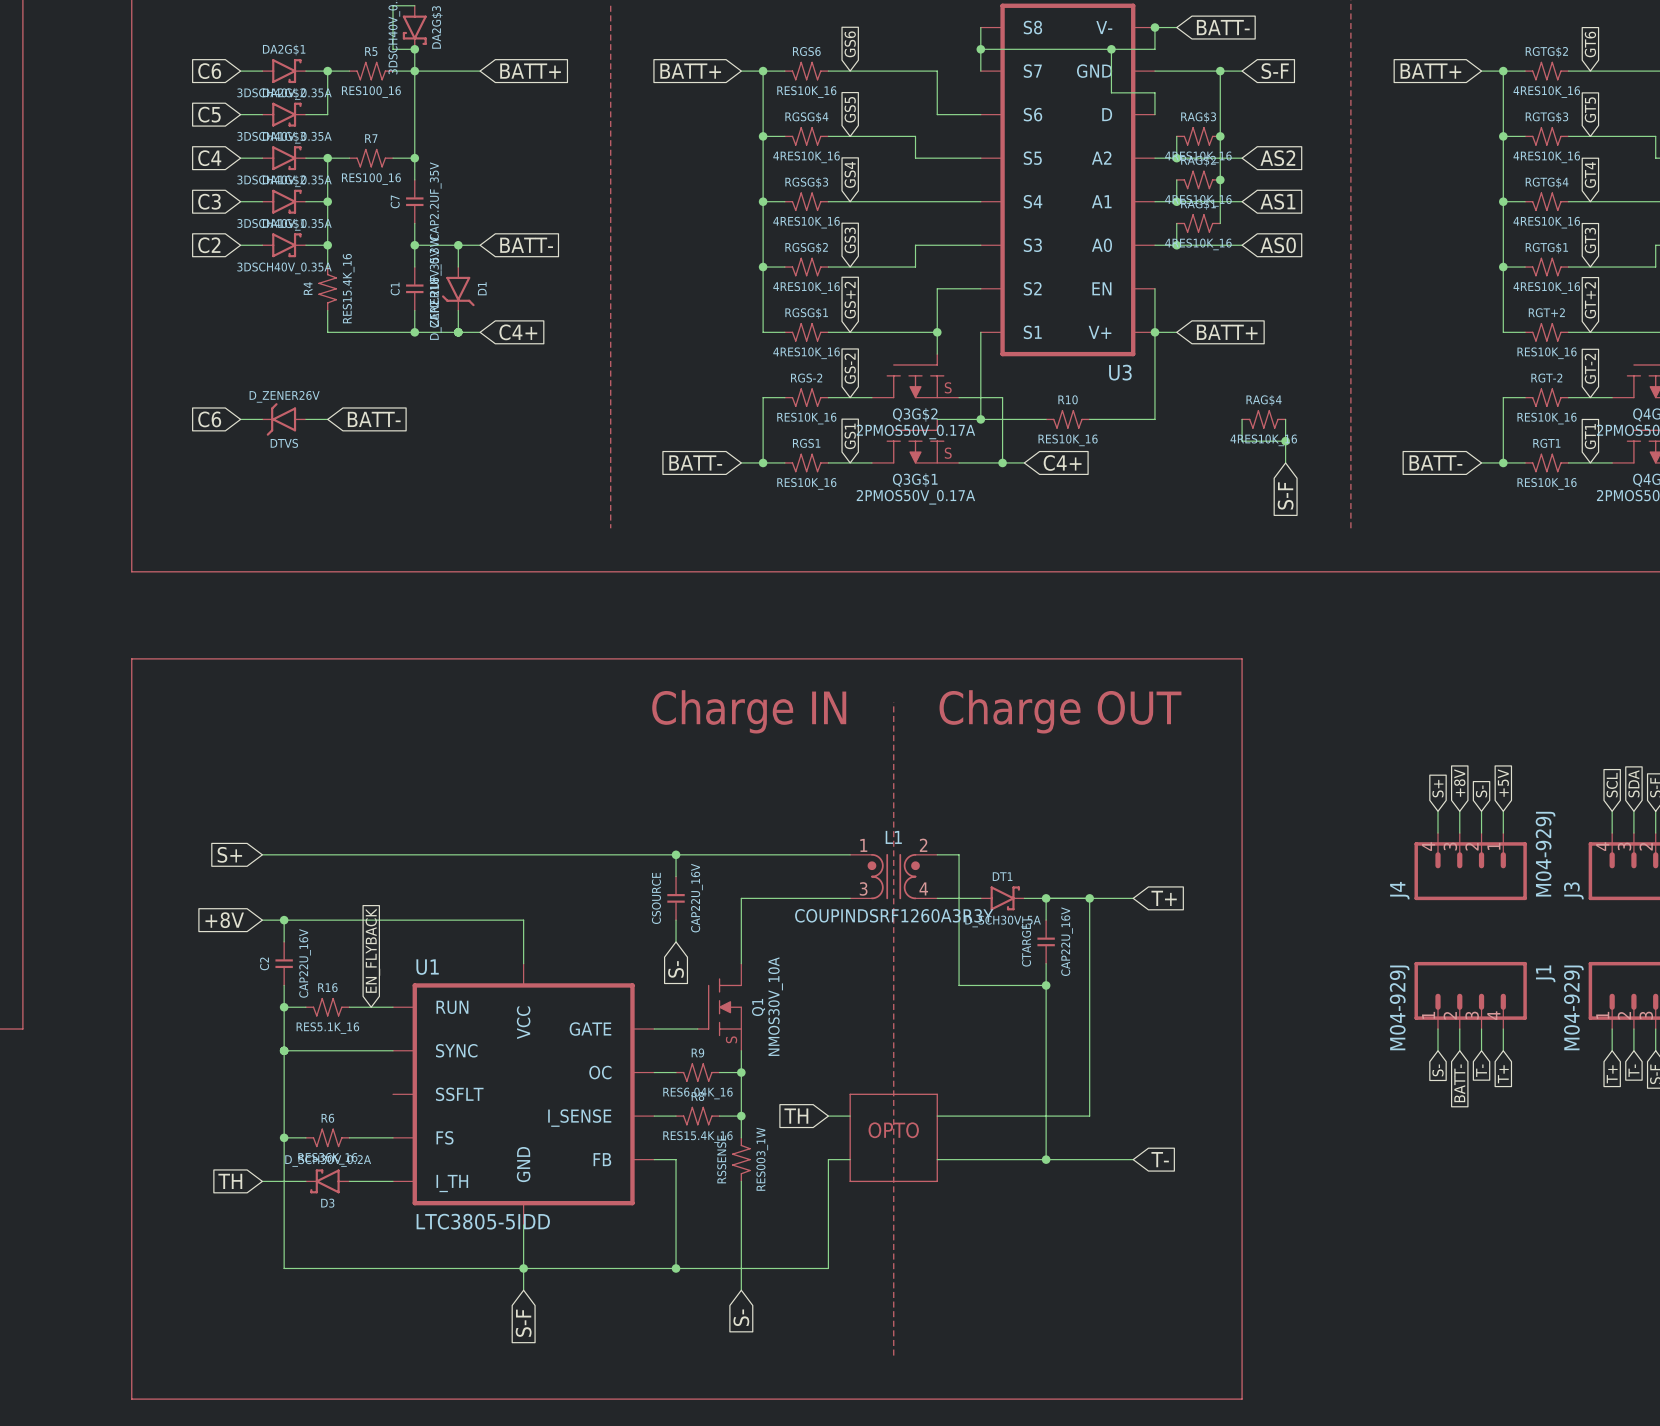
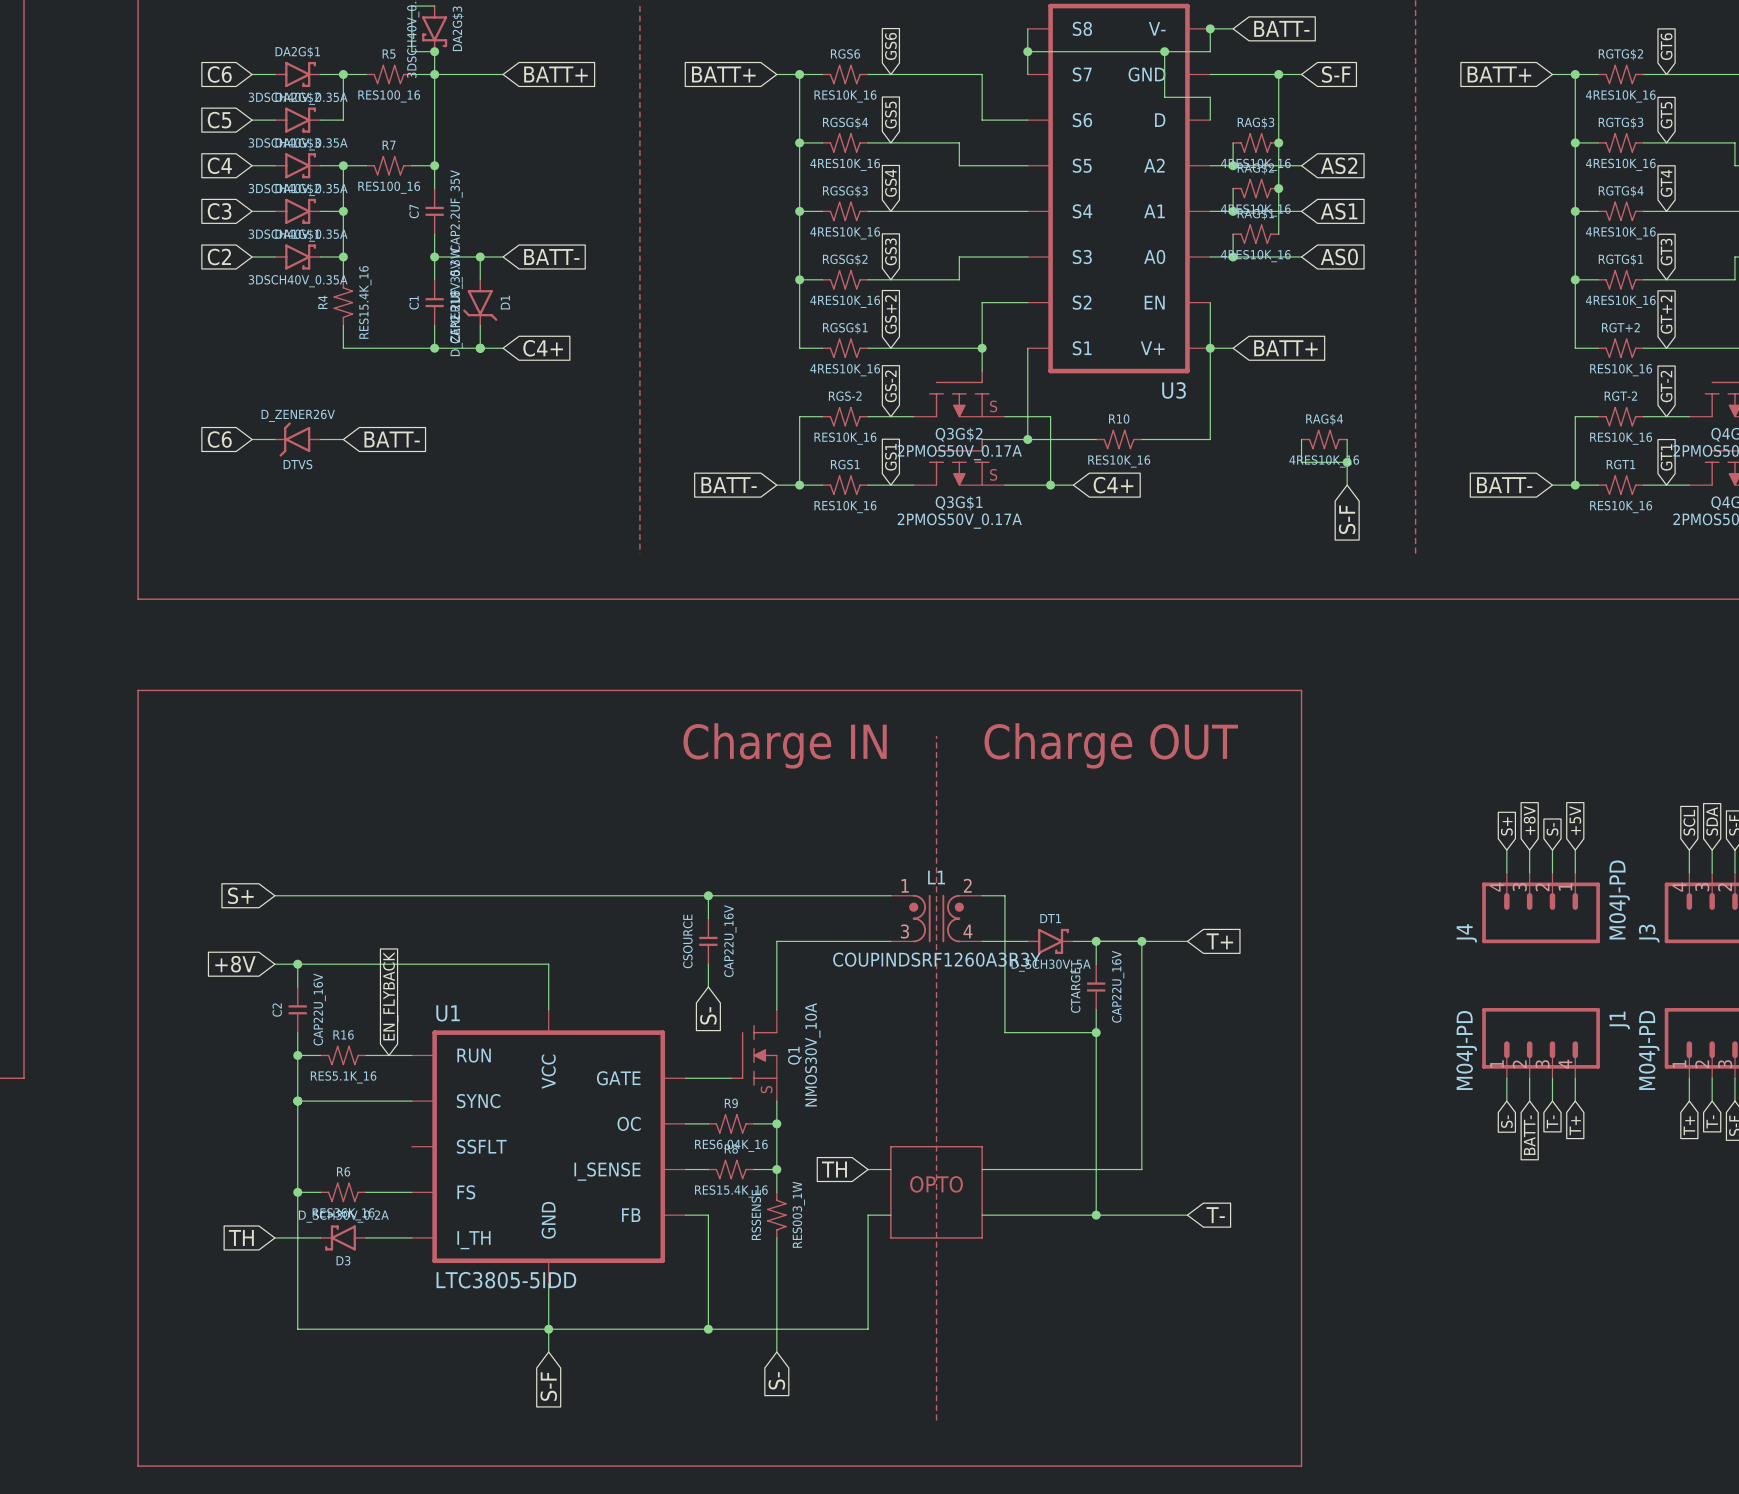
J4 value: M04-929J (1545, 854) -> M04J-PD (1619, 899)
J1 value: M04-929J (1399, 1007) -> M04J-PD (1466, 1050)
part value: M04-929J (1573, 1007) -> M04J-PD (1649, 1050)

